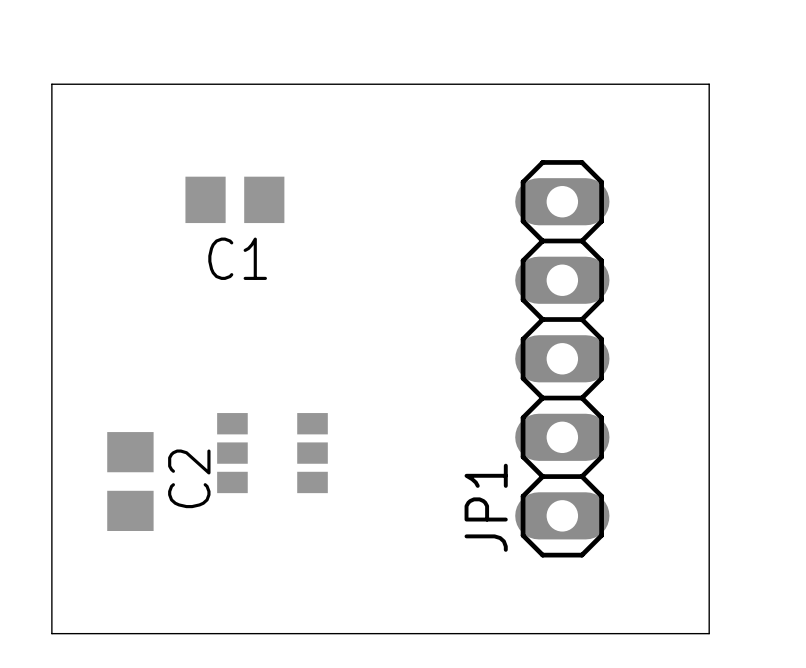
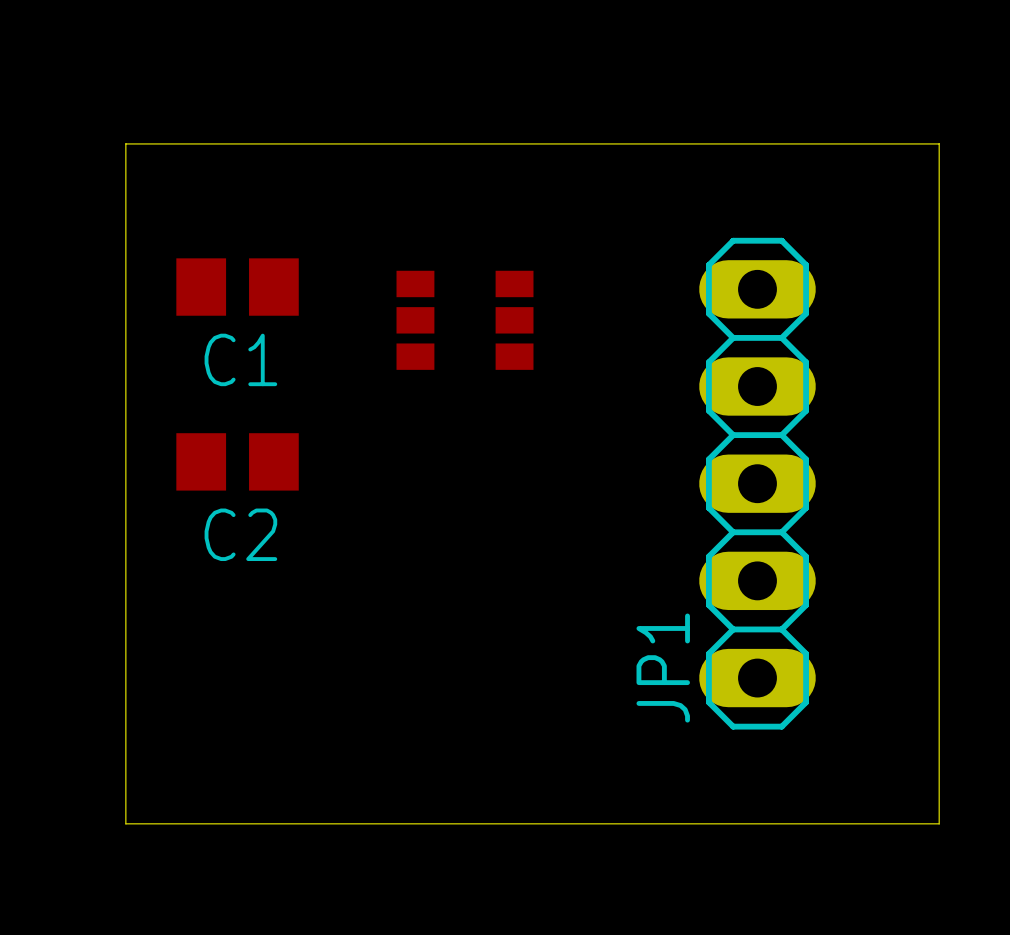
C1 position: (234, 199) -> (237, 287)
part position: (272, 453) -> (465, 320)
C2 rotation: 0° (130, 481) -> 90° clockwise (237, 461)
C2 position: (130, 481) -> (237, 461)

